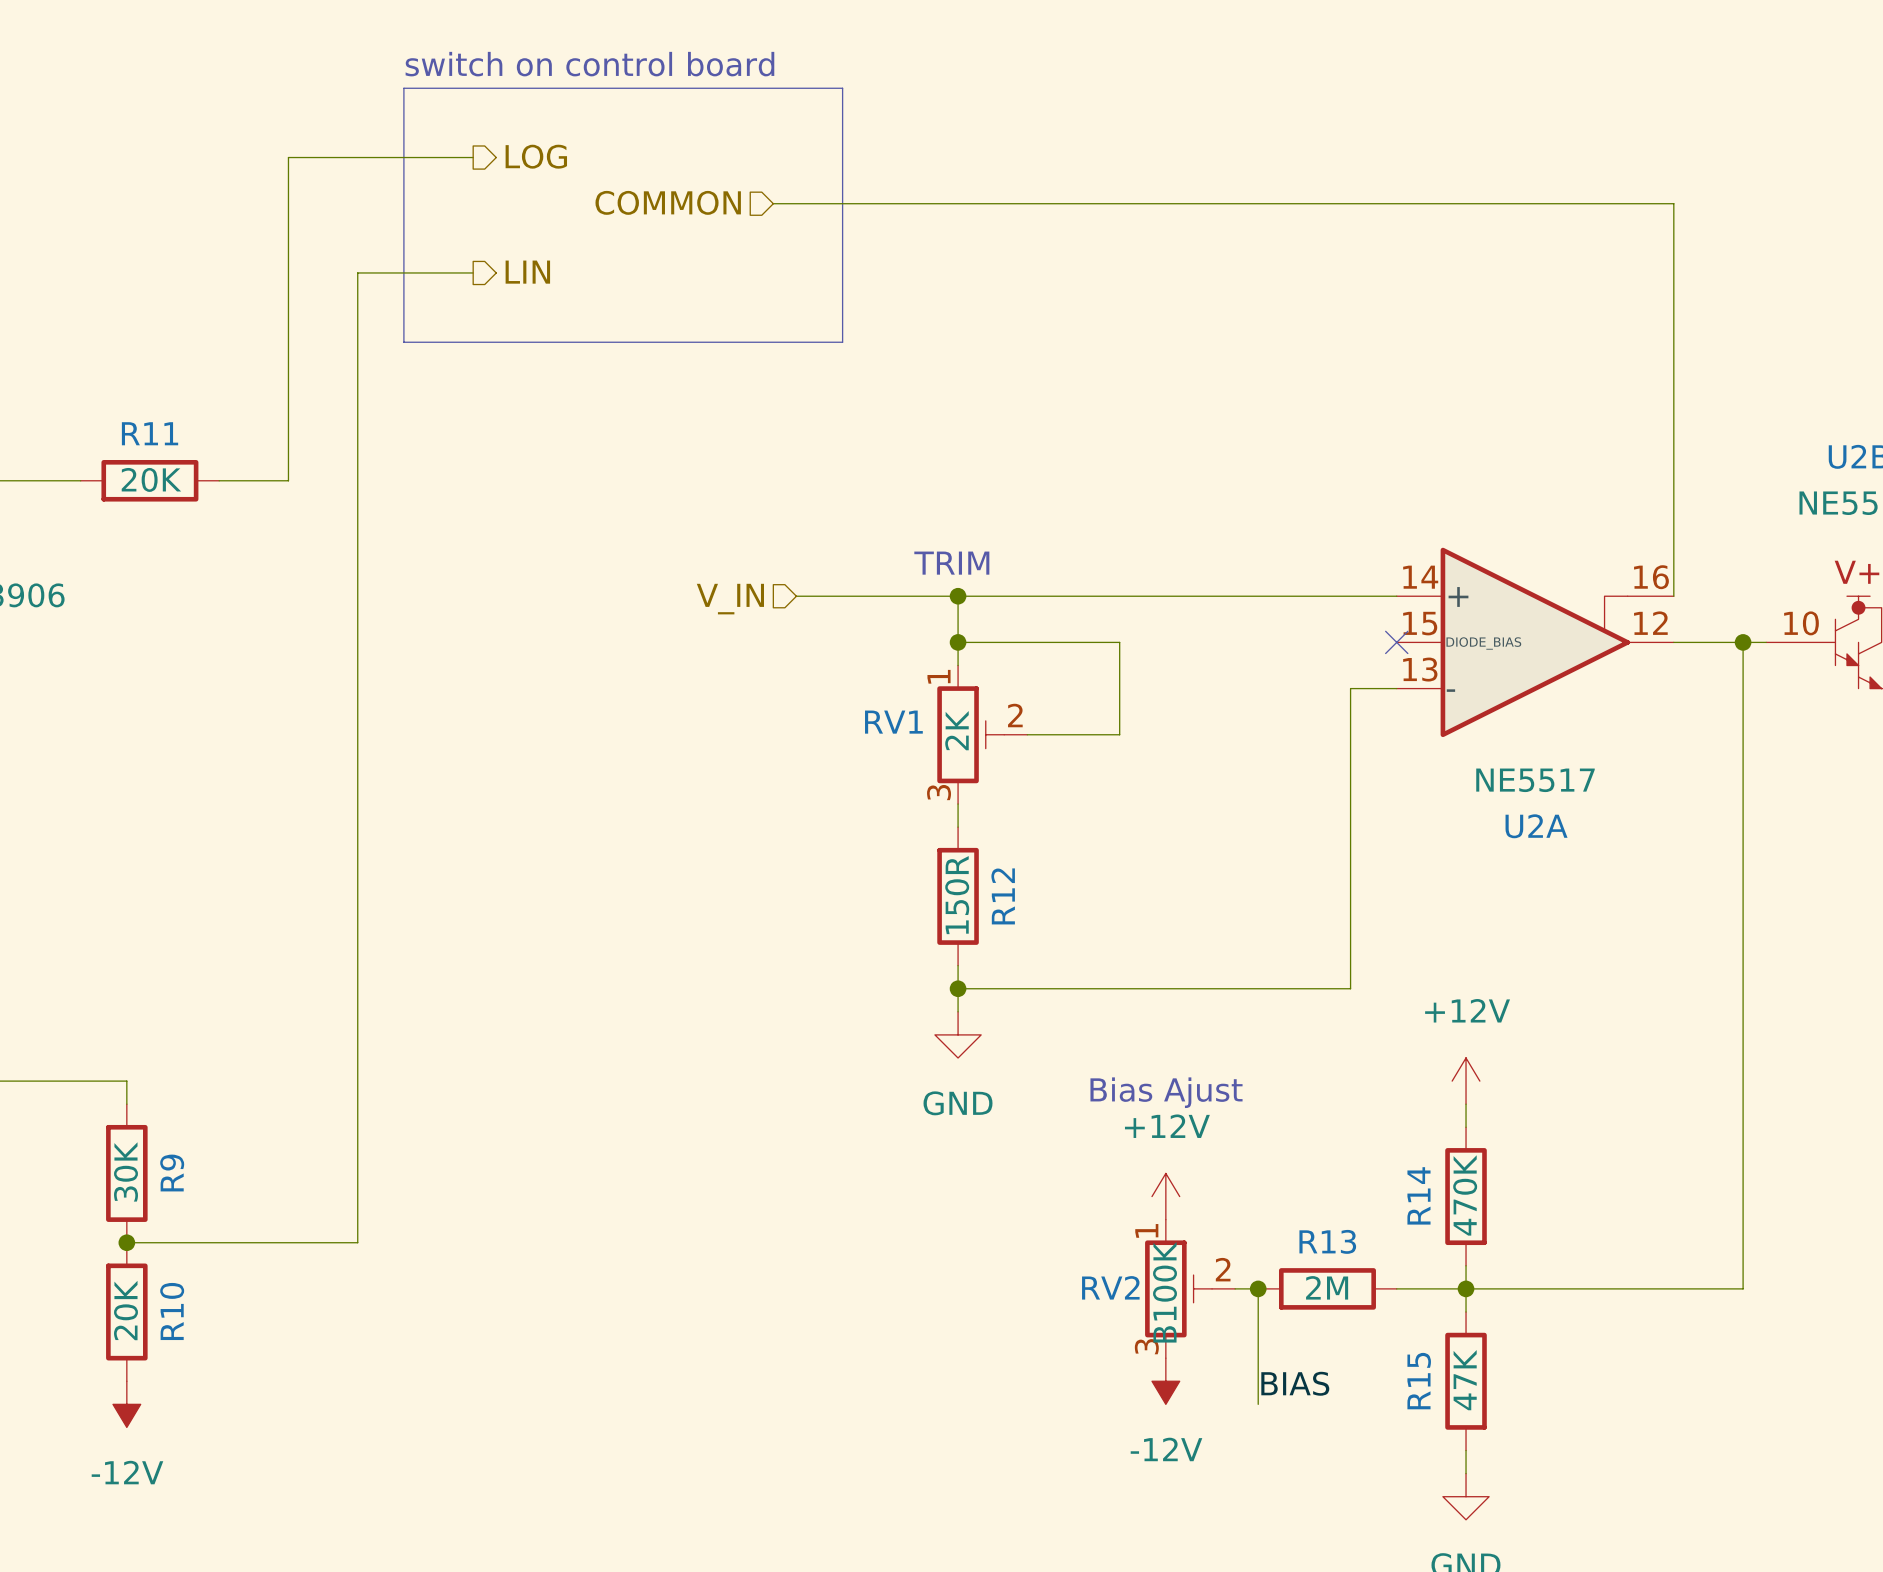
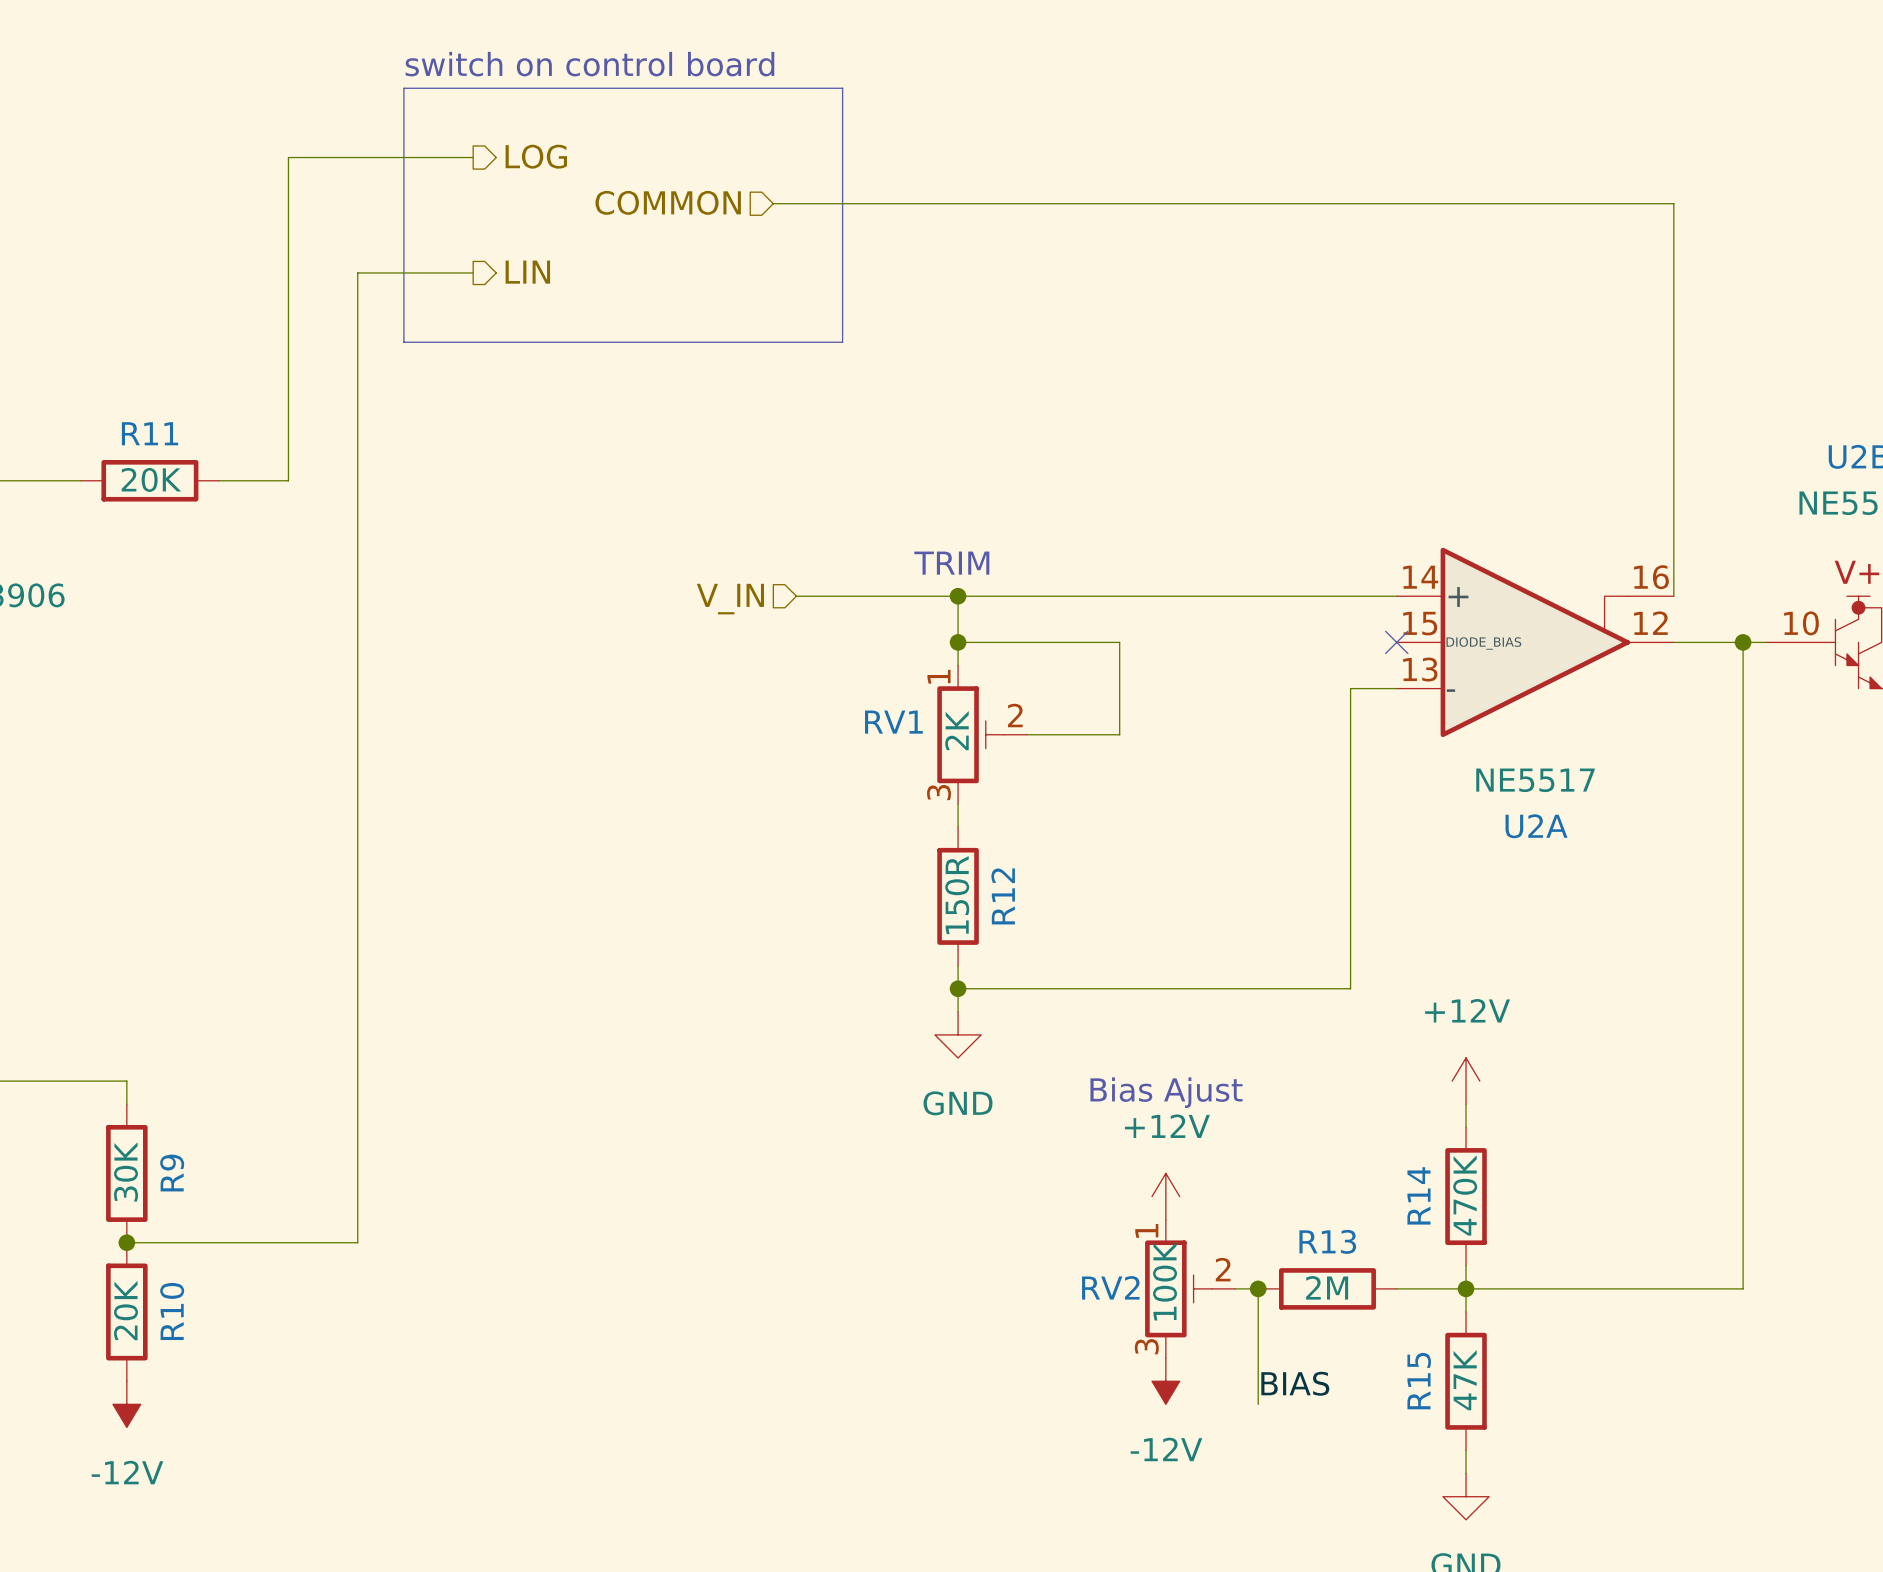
RV2 value: B100K (1165, 1292) -> 100K (1165, 1281)

